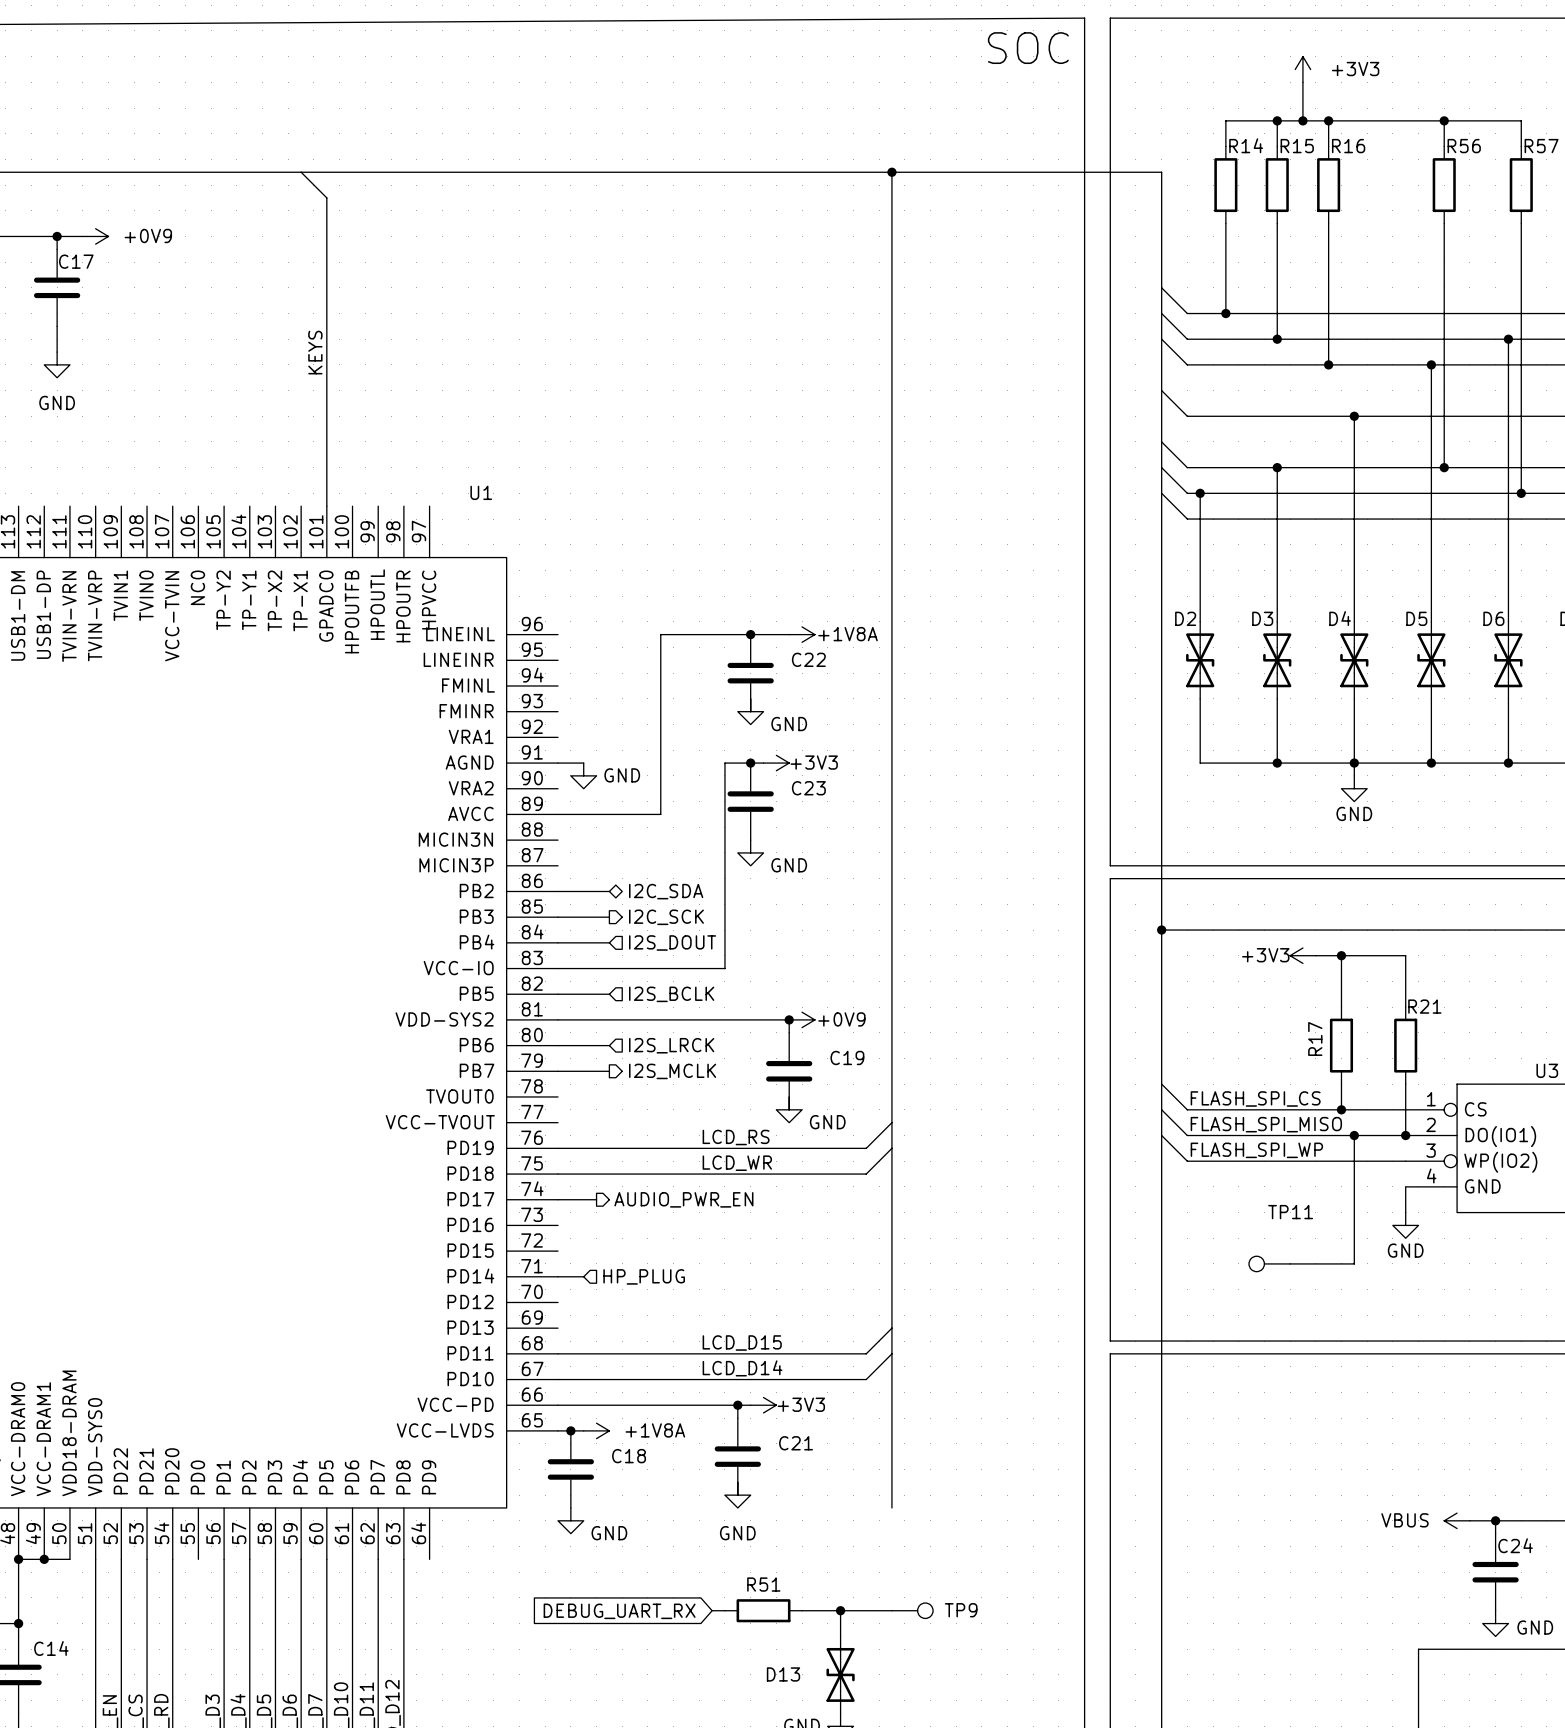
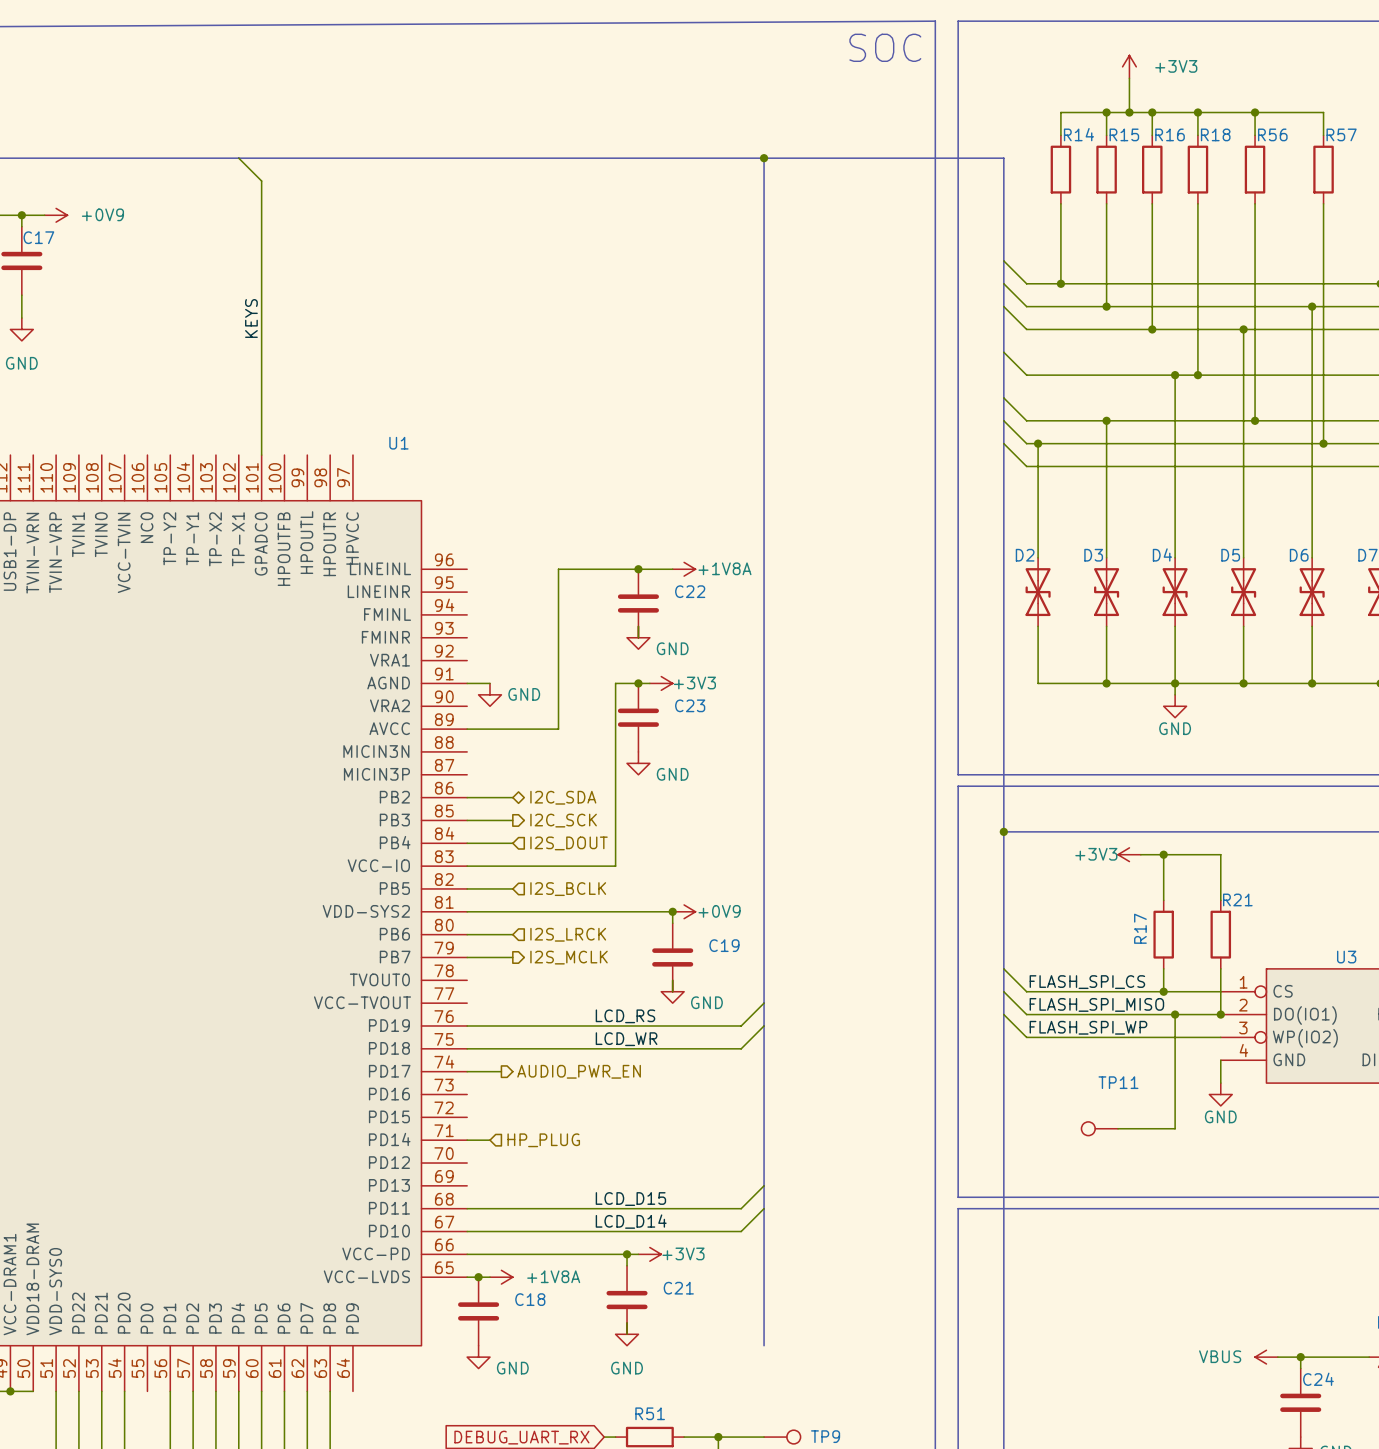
wire: none -> (1197, 112) (1197, 135)
junction: none -> (1197, 112)
R18: none -> (1197, 169)
wire: none -> (1197, 203) (1197, 375)
junction: none -> (1197, 375)

